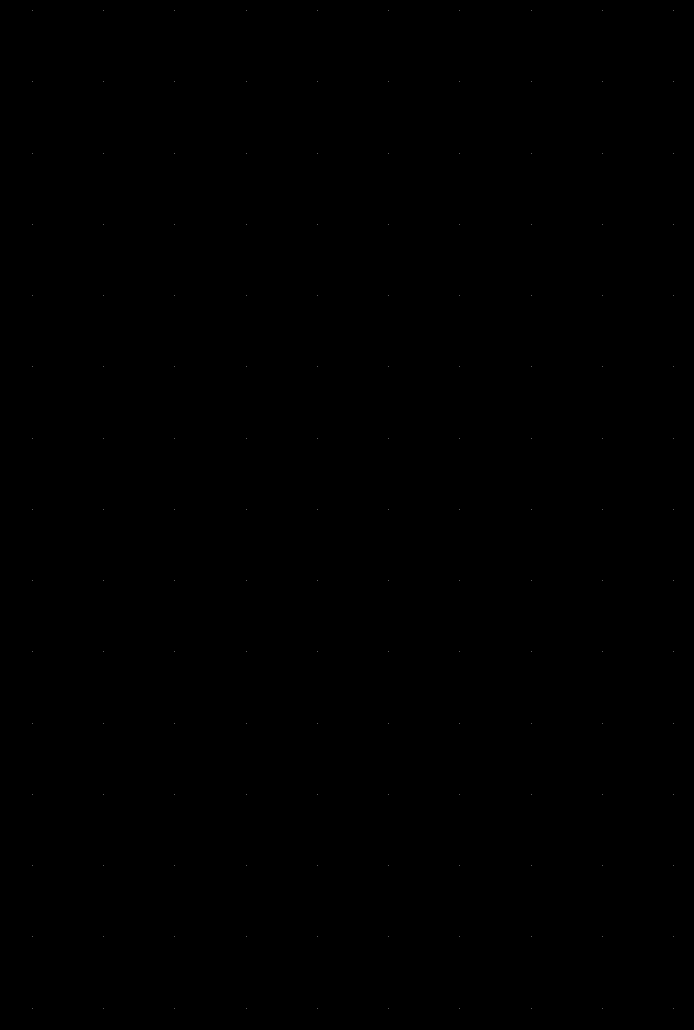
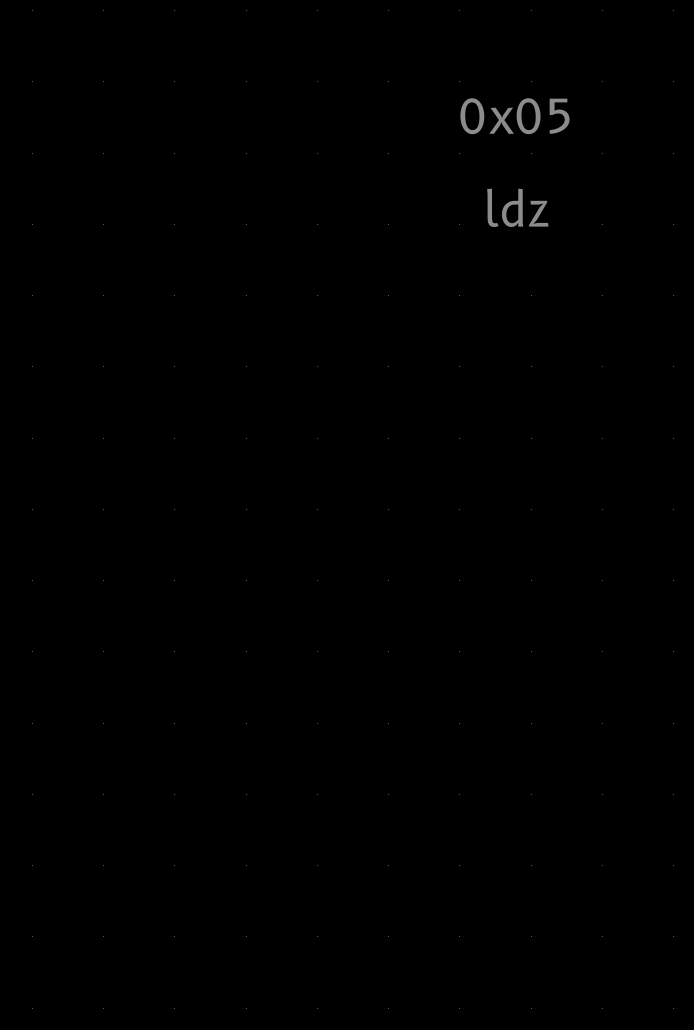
text: none -> 0x05 (514, 116)
text: none -> ldz (517, 207)

